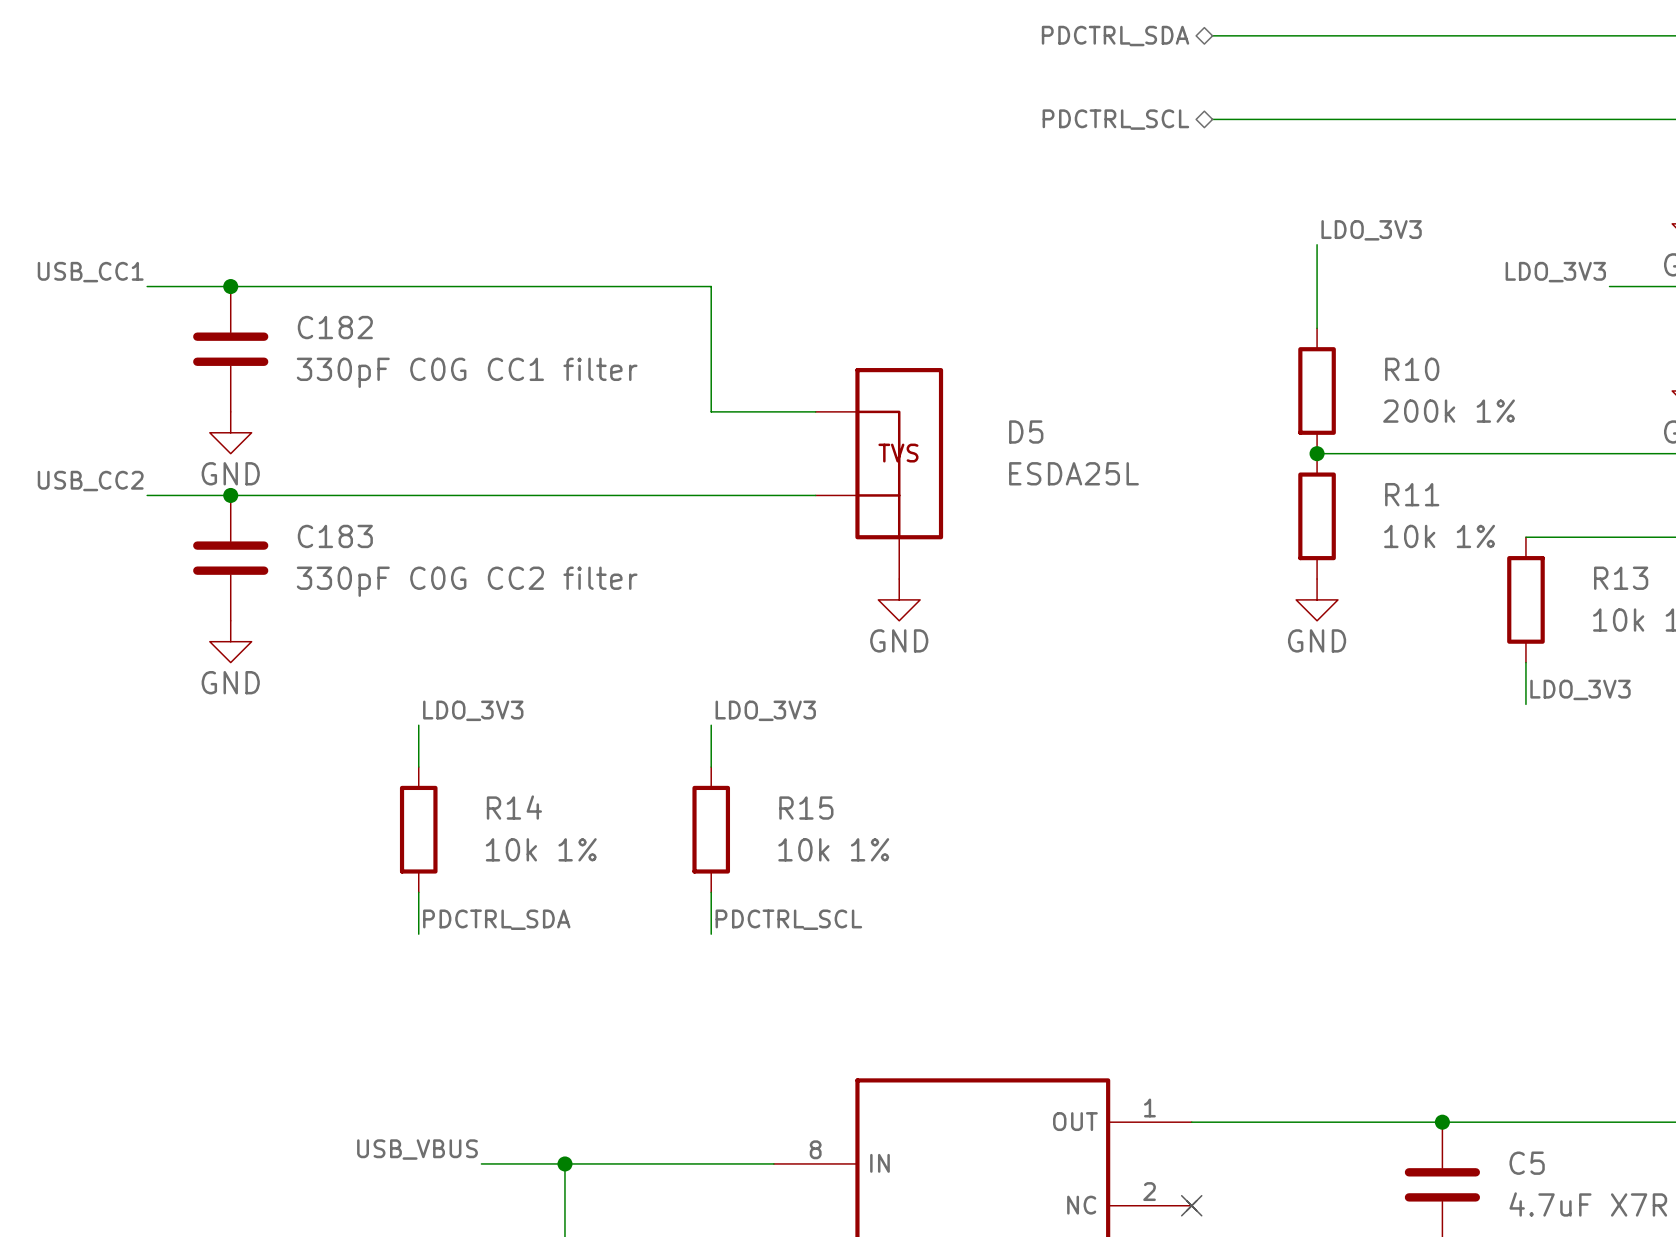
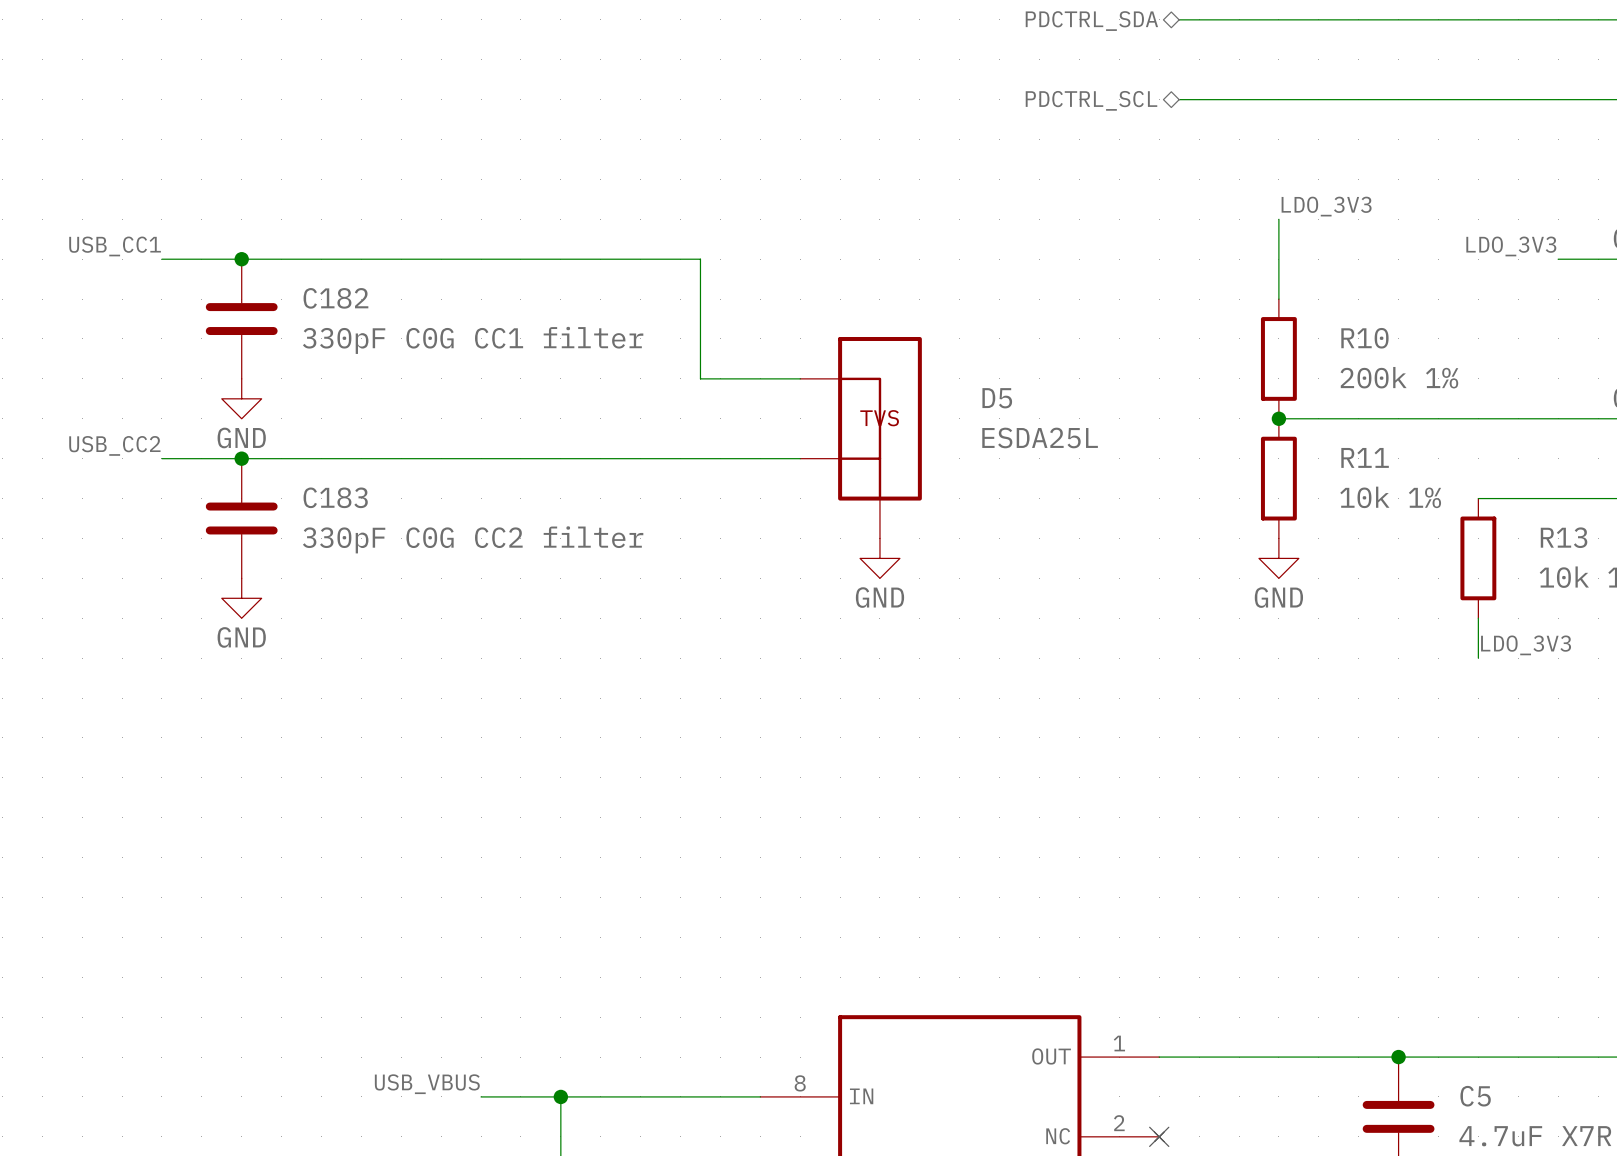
label: LDO_3V3 (473, 710) -> none
label: LDO_3V3 (765, 710) -> none
wire: (418, 725) (418, 767) -> none
wire: (711, 725) (711, 767) -> none
R14: 10k 1% (418, 829) -> none
R15: 10k 1% (711, 829) -> none
wire: (418, 892) (418, 934) -> none
wire: (711, 892) (711, 934) -> none
label: PDCTRL_SDA (496, 919) -> none
label: PDCTRL_SCL (788, 919) -> none

